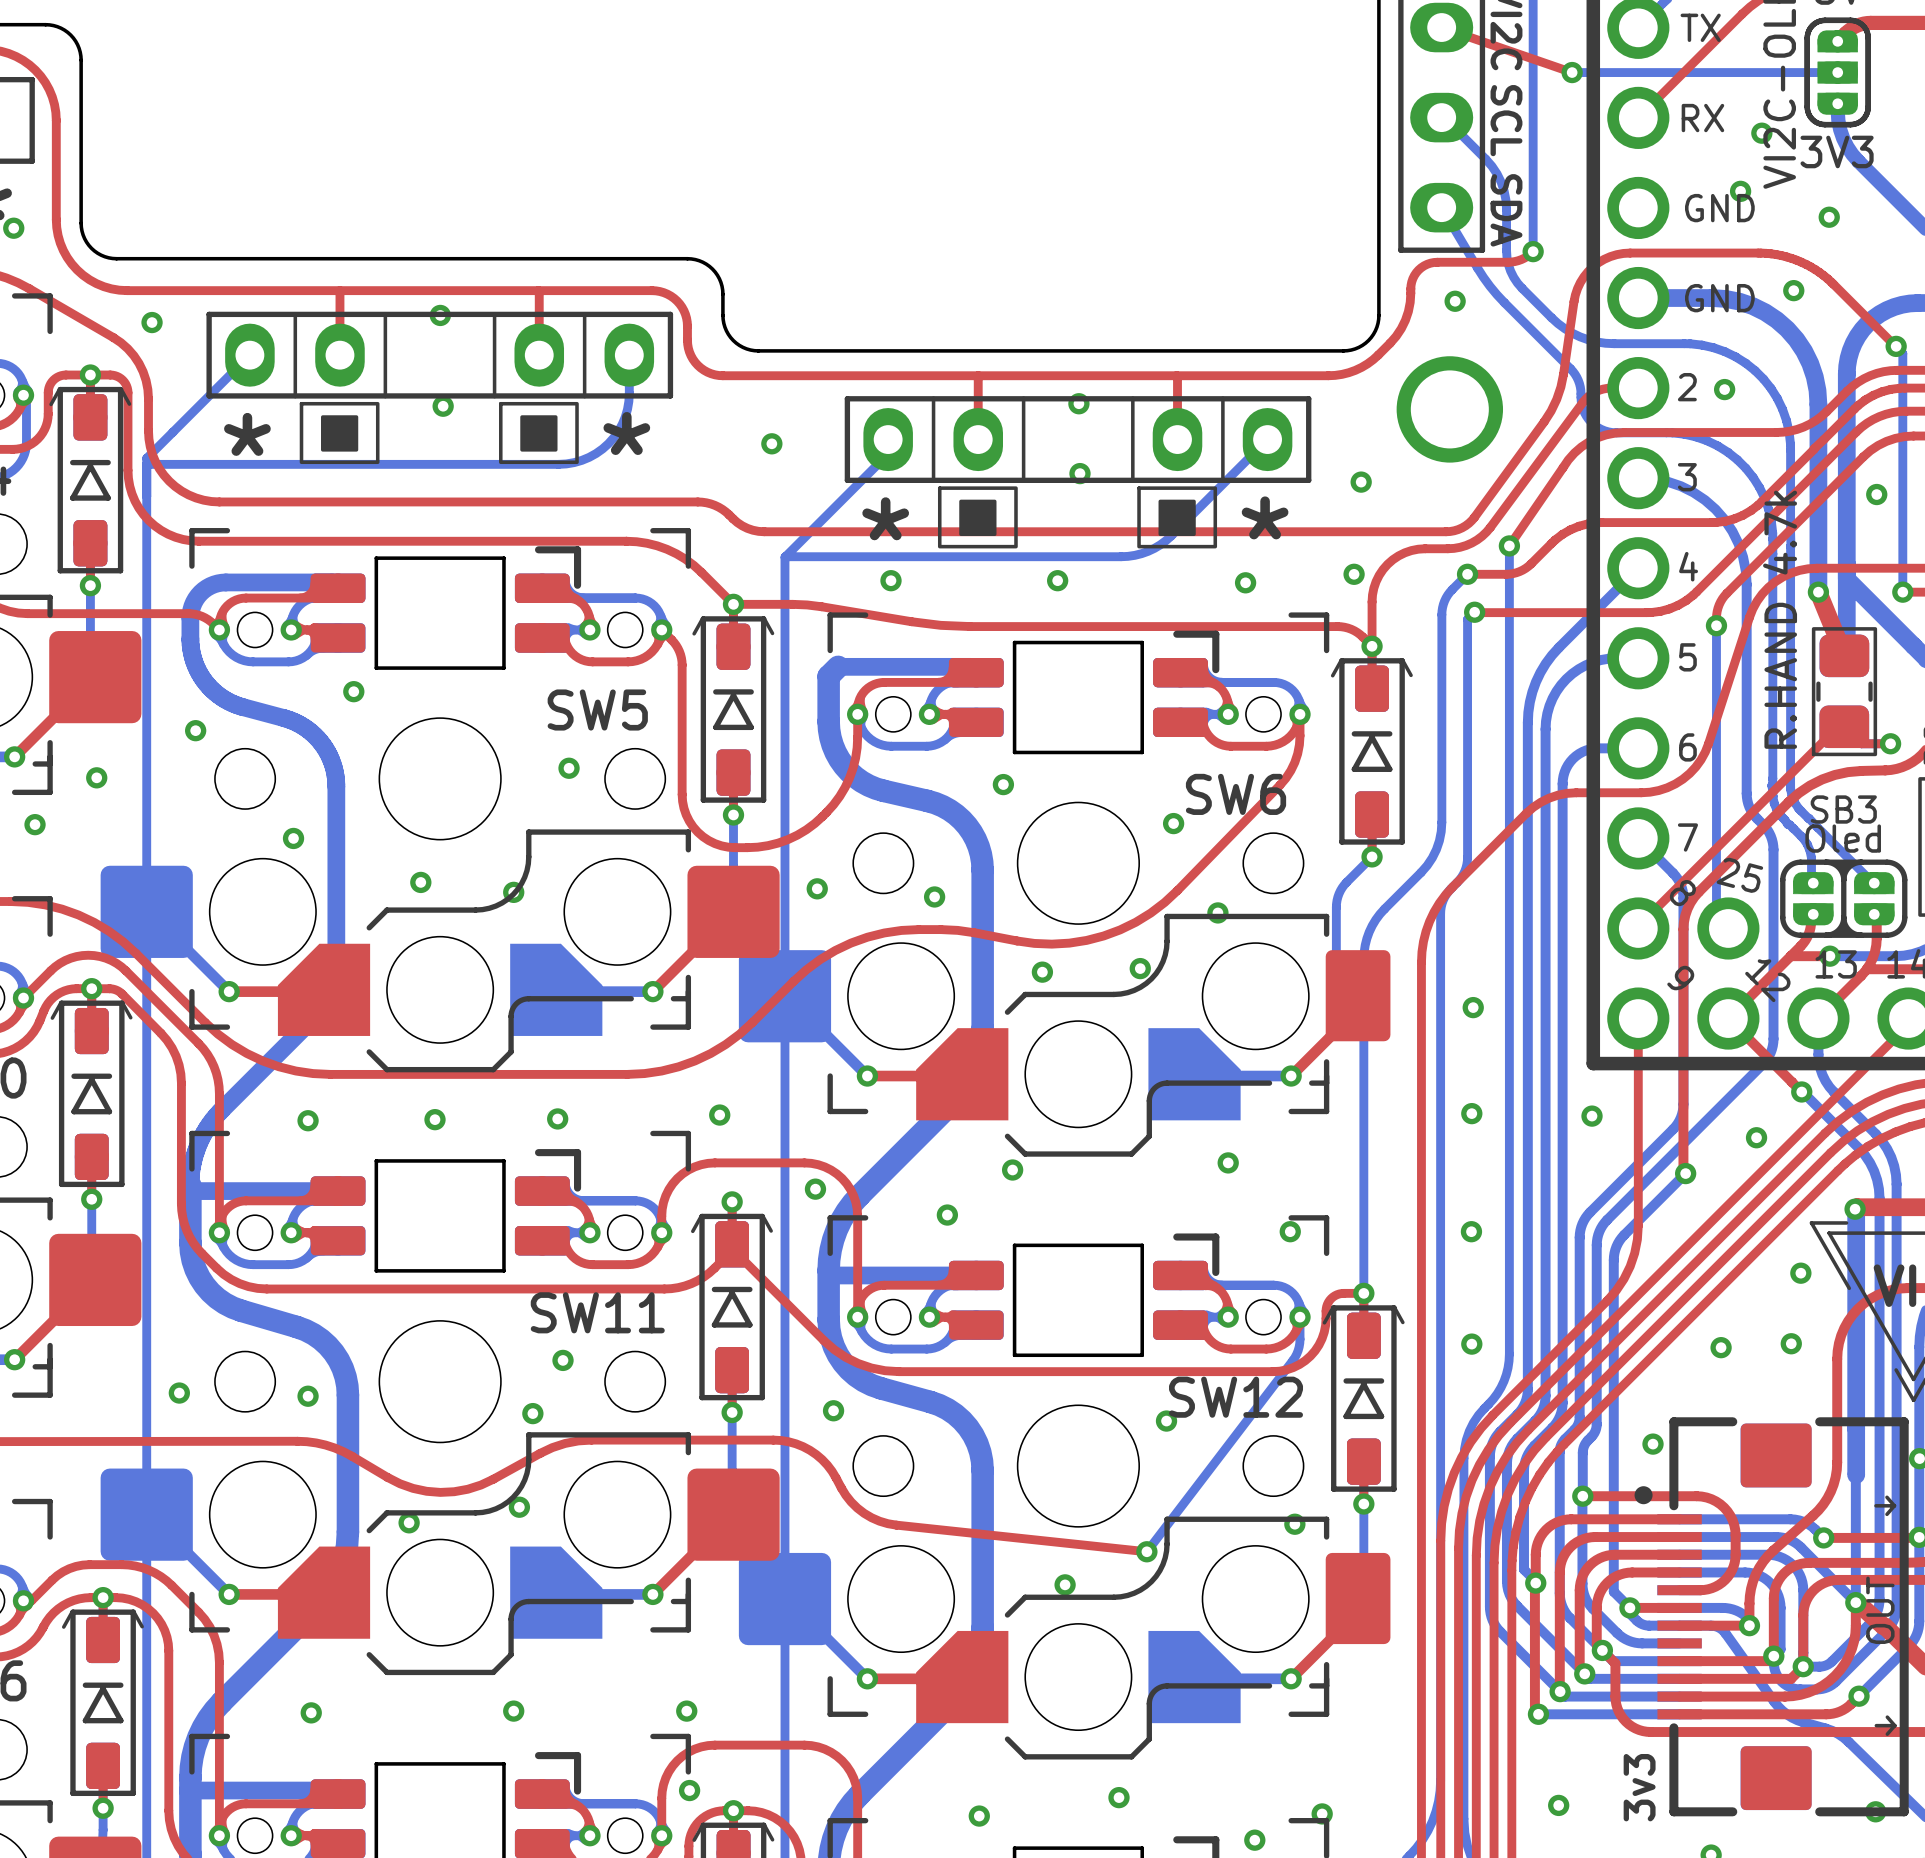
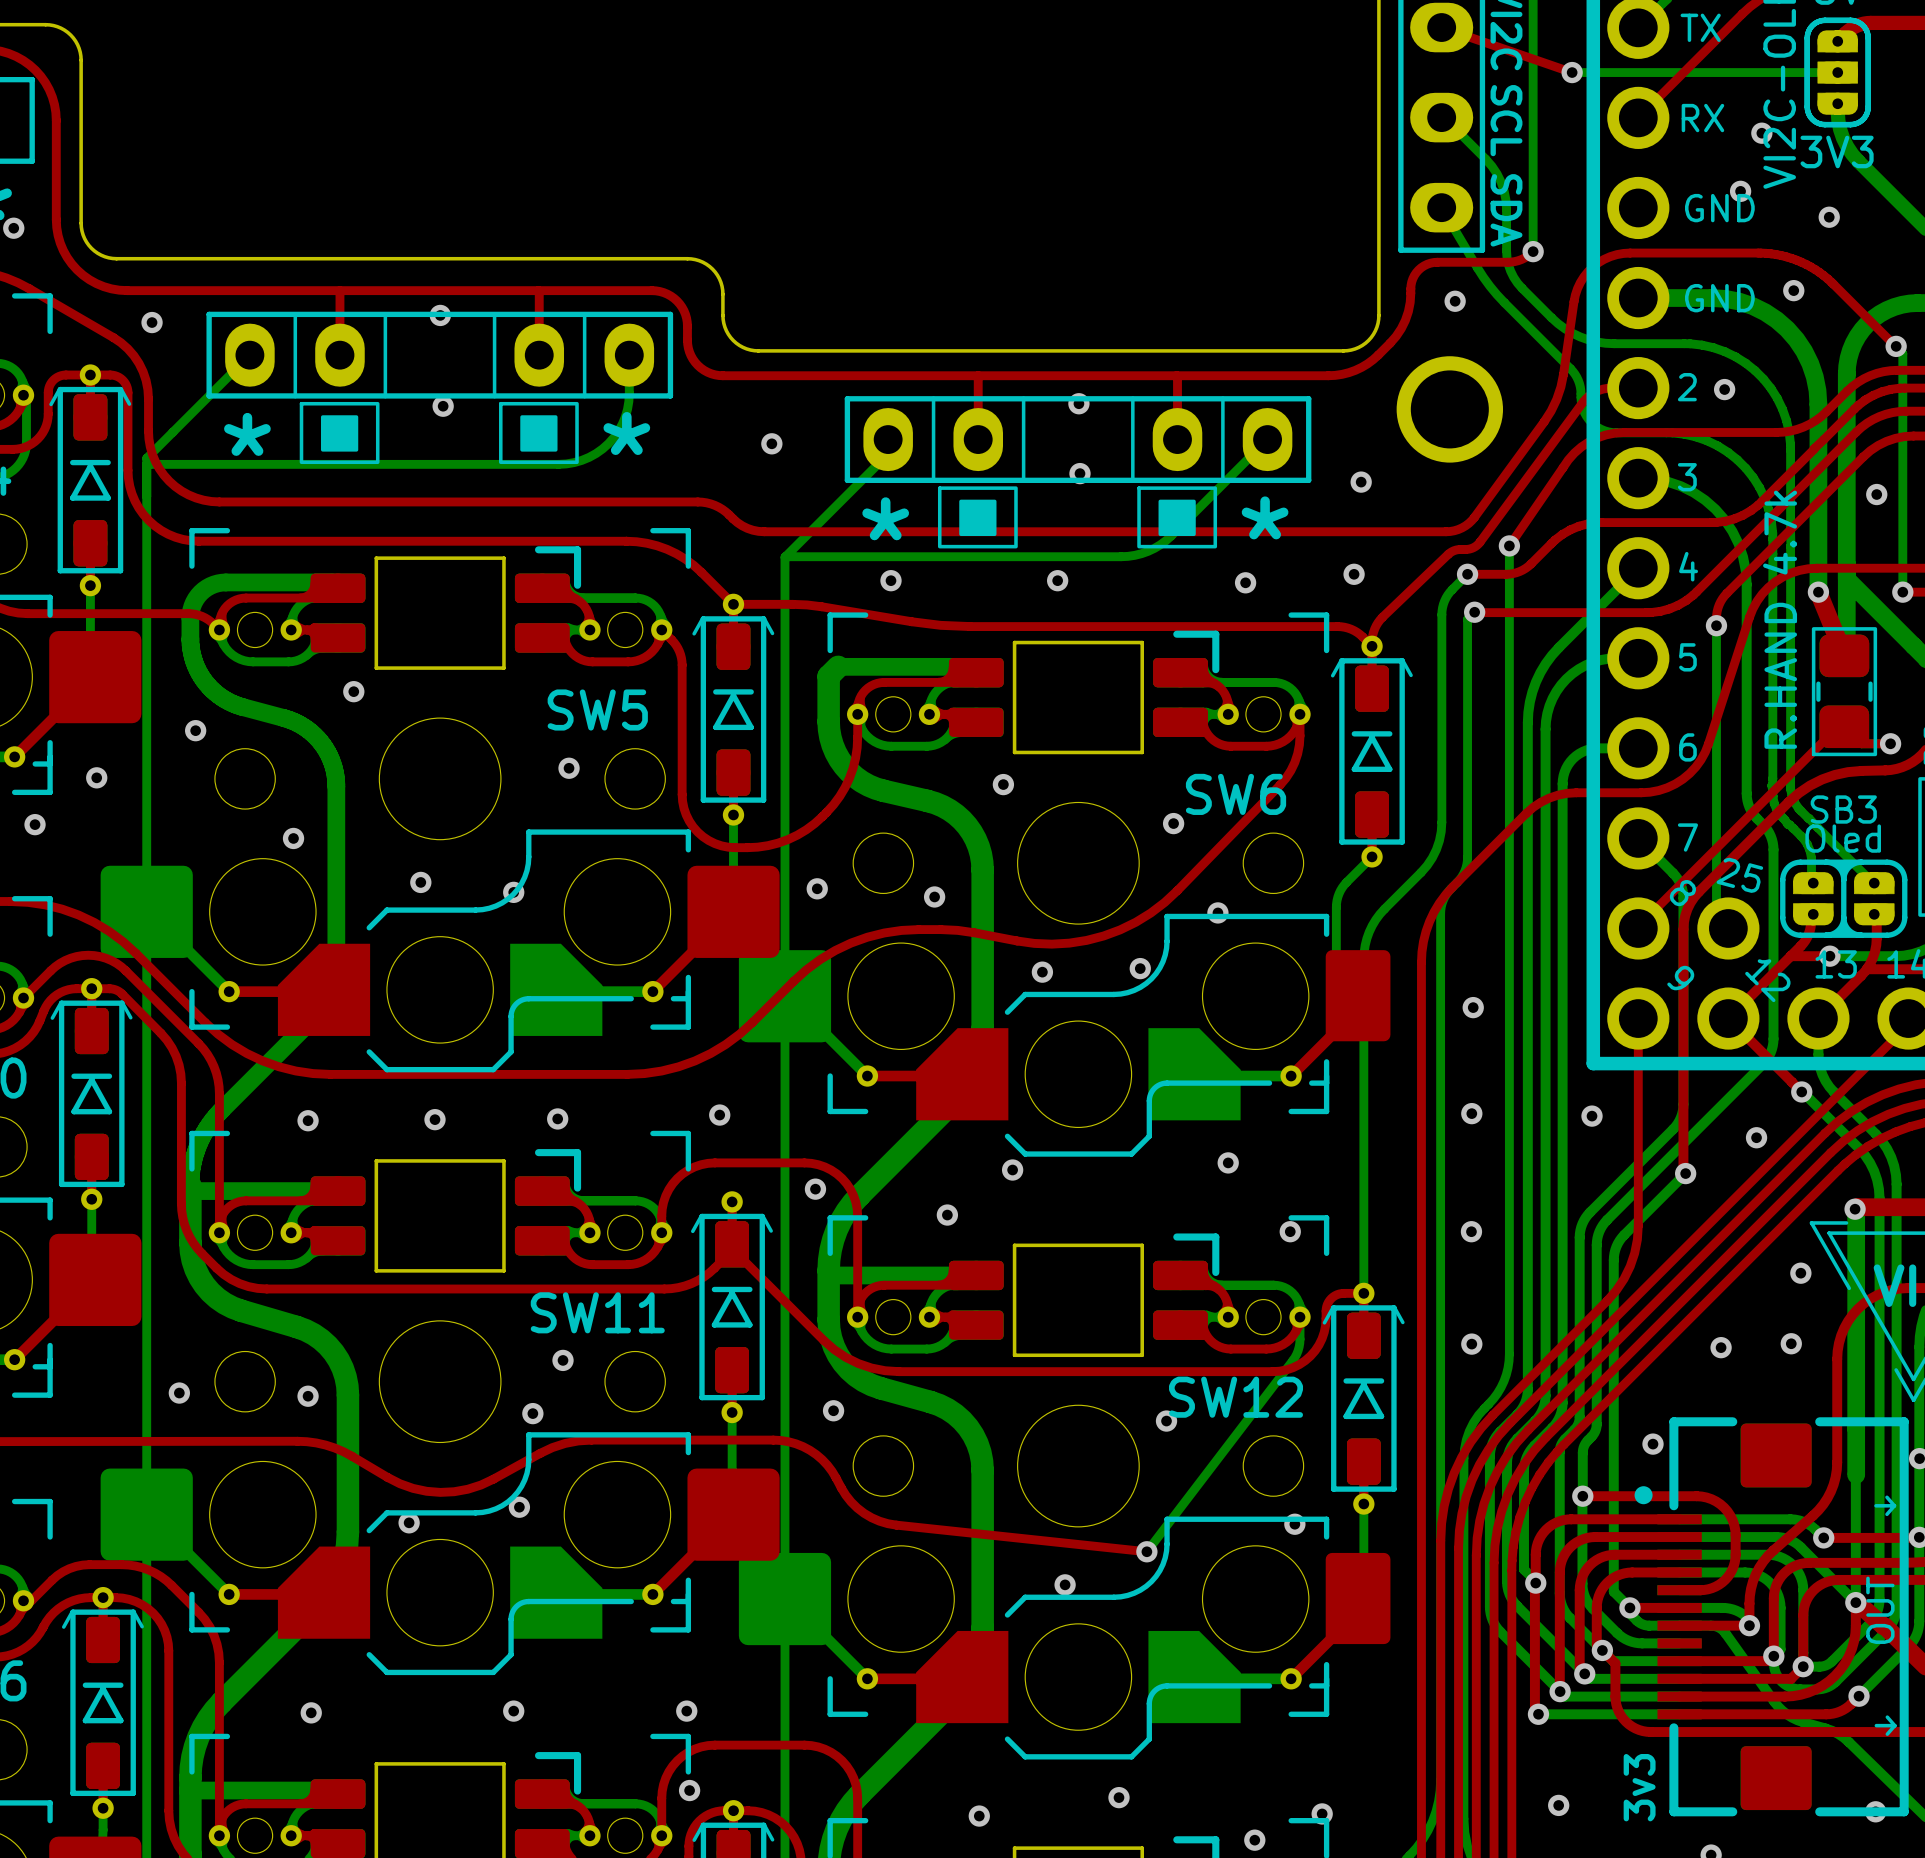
top track: (1582, 402) (1482, 536) (1460, 547) (1411, 550) (1398, 555) (1387, 564) (1379, 575) (1373, 588) (1372, 642) -> (1582, 402) (1478, 543) (1471, 548) (1456, 550) (1448, 554) (1380, 619) (1374, 628) (1372, 642)

